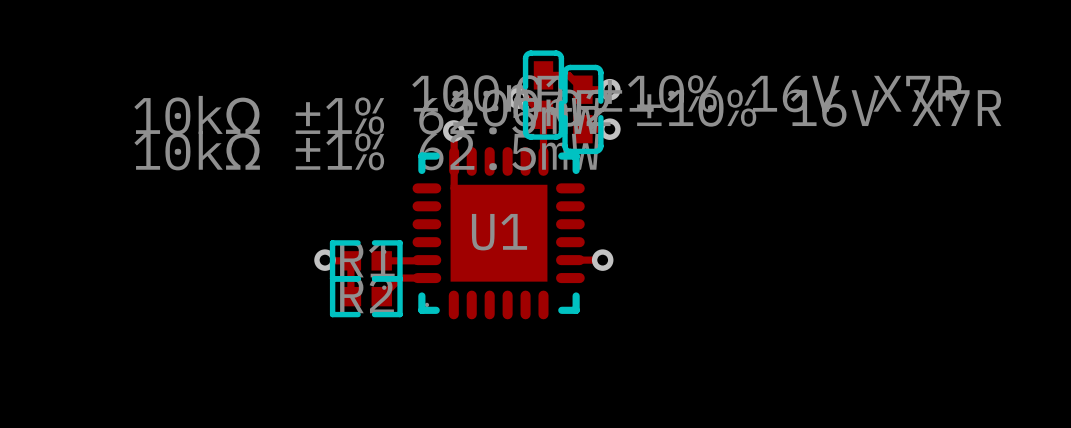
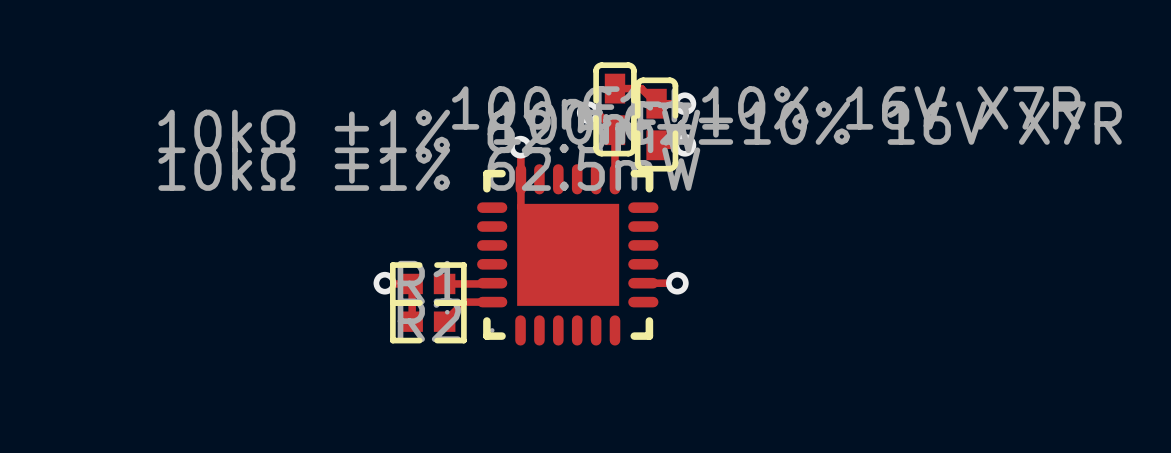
U1 name: U1 (499, 232) -> none

